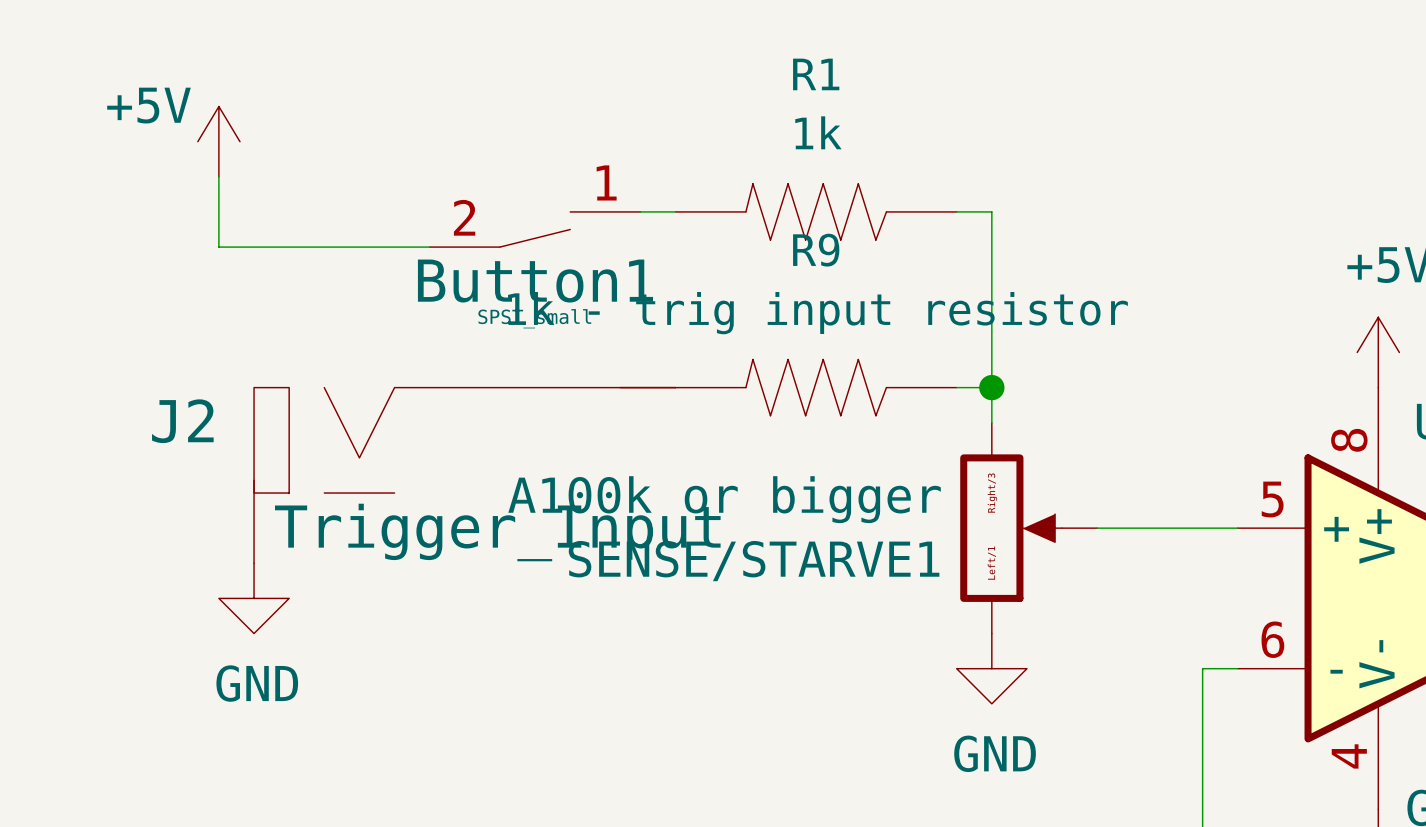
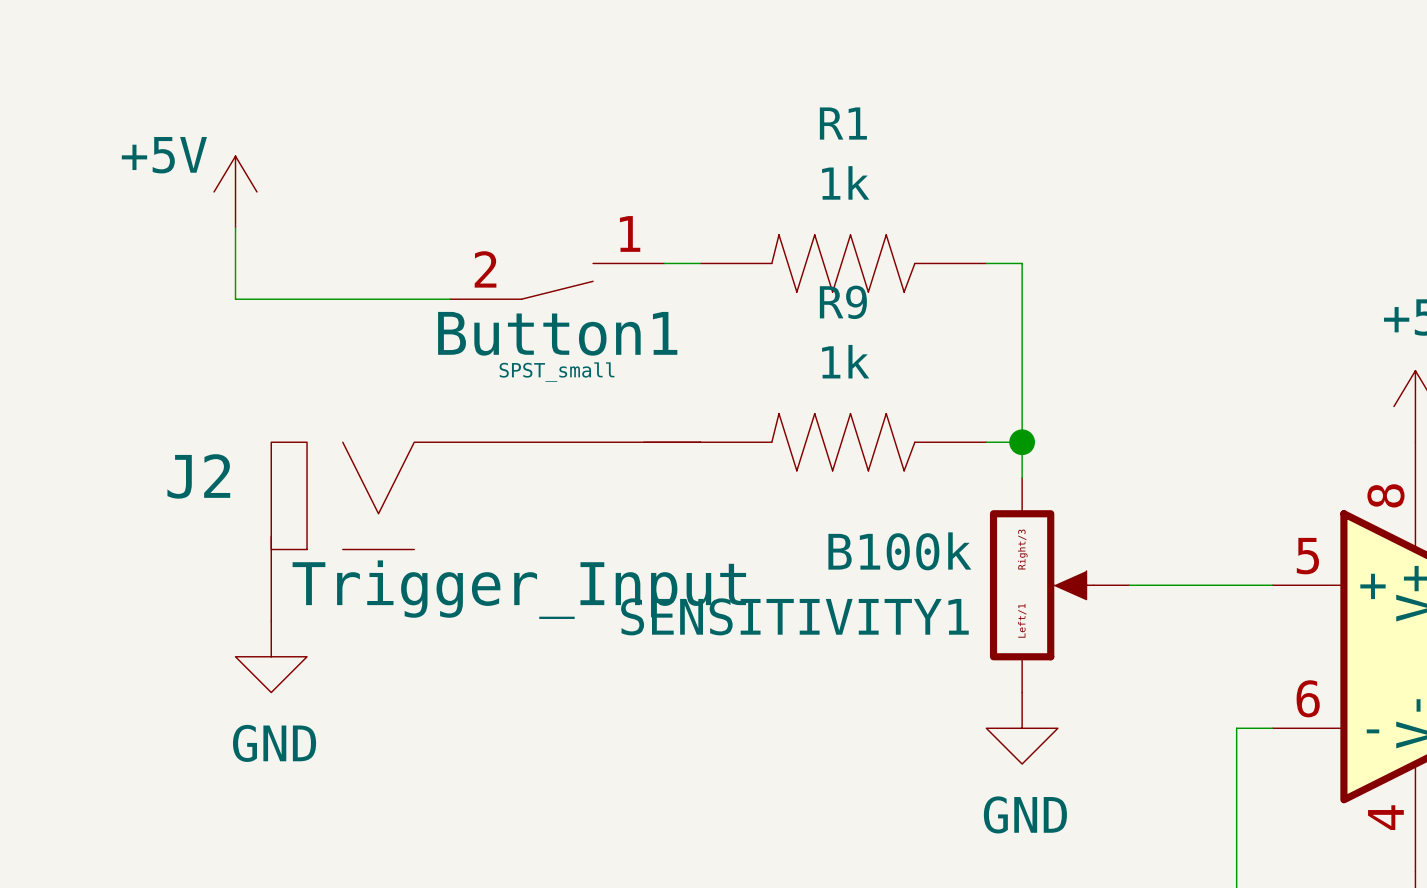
R9 value: 1k - trig input resistor (817, 313) -> 1k (845, 361)
SENSE/STARVE1 value: A100k or bigger (724, 499) -> B100k (899, 551)
SENSE/STARVE1 name: SENSE/STARVE1 (754, 561) -> SENSITIVITY1 (794, 616)

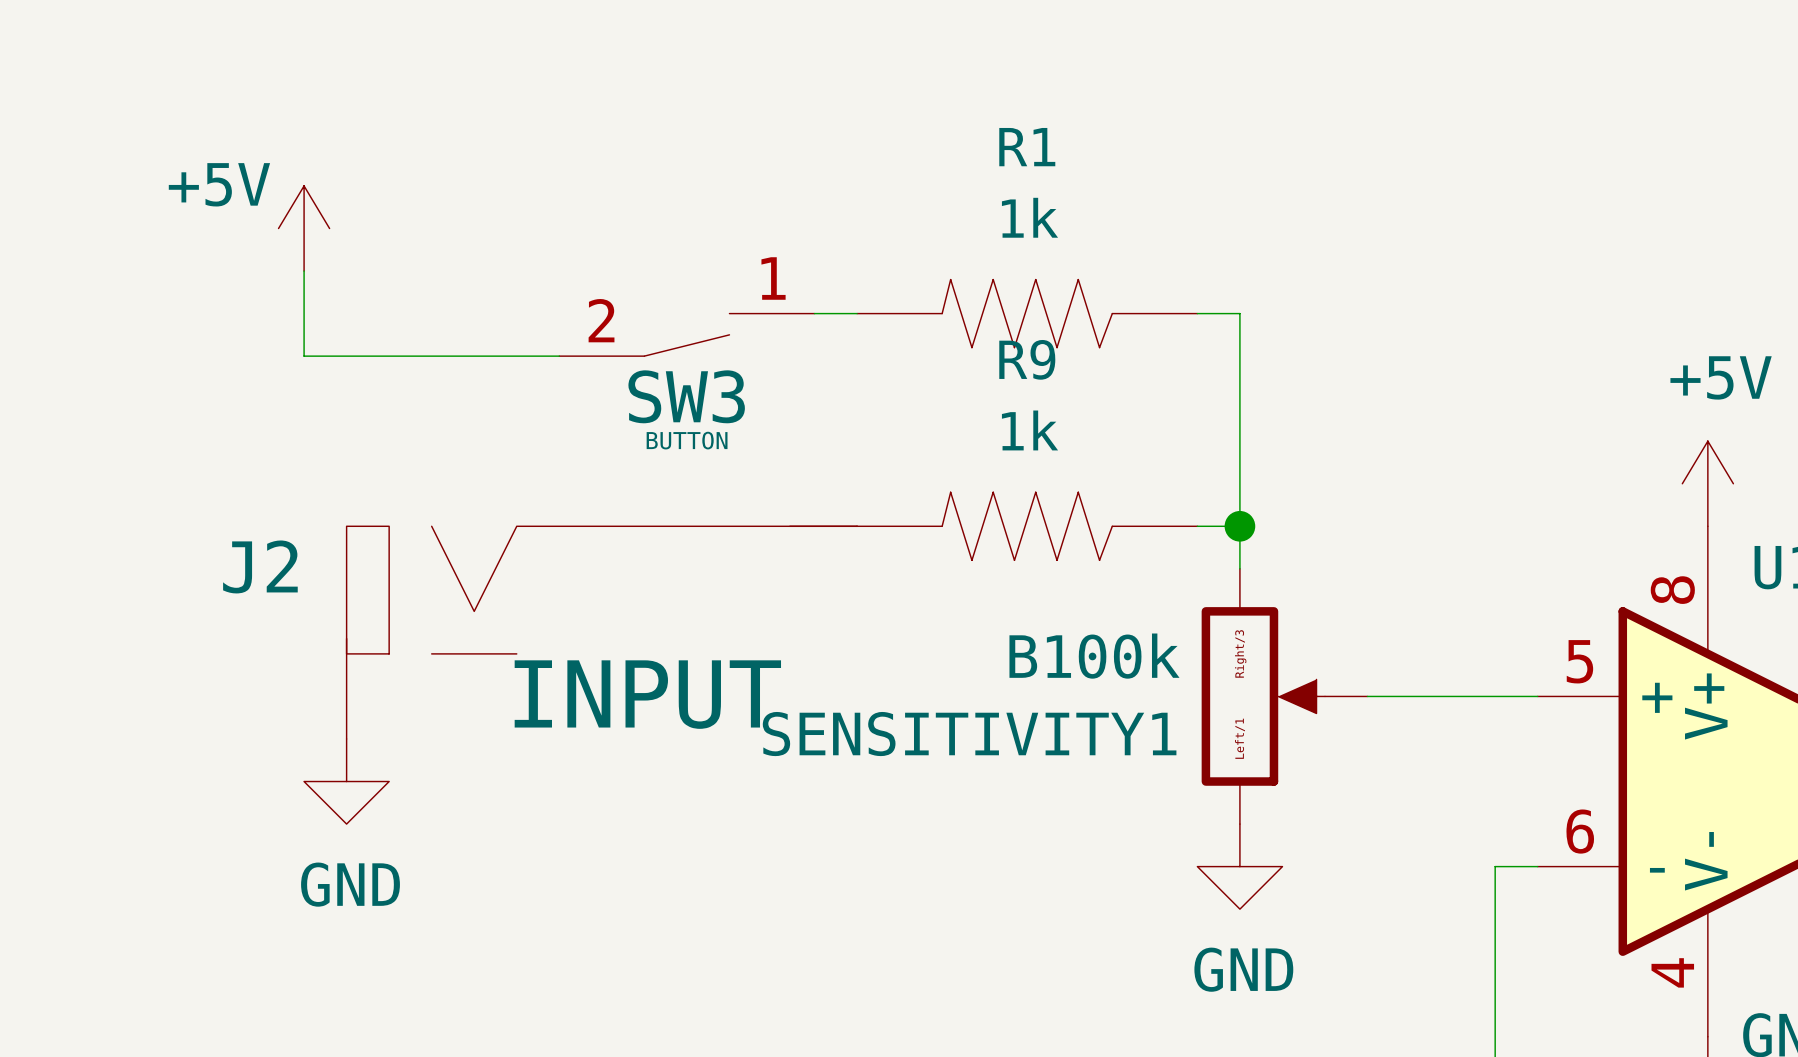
Button1 name: Button1 (557, 333) -> SW3 (686, 396)
Button1 value: SPST_small (557, 372) -> BUTTON (687, 440)
J2 value: Trigger_Input (519, 589) -> INPUT (647, 694)

